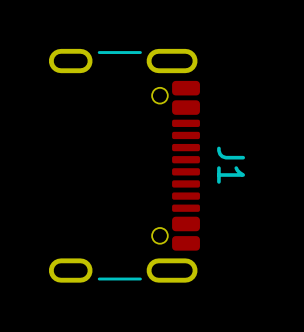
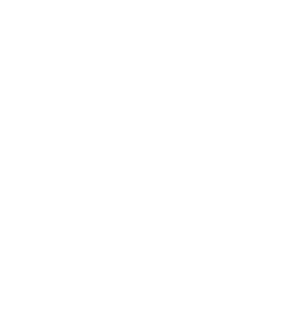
J1: (124, 165) -> none

